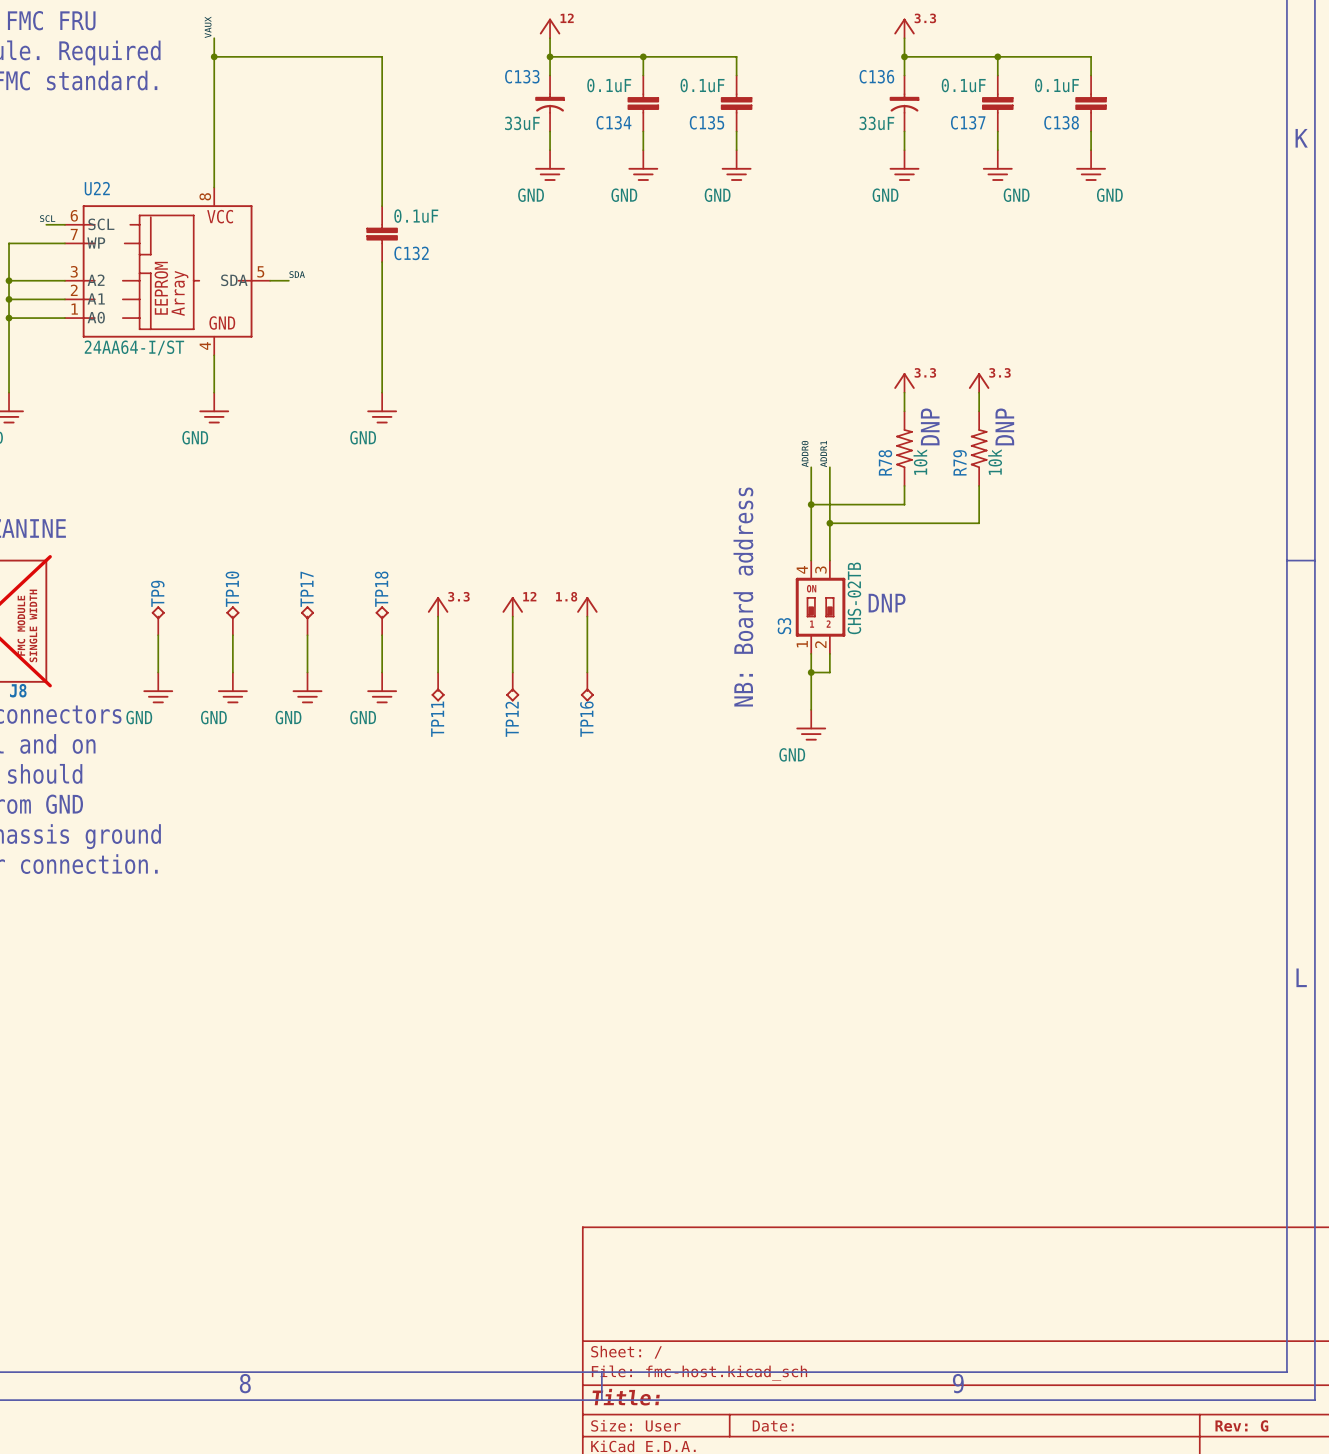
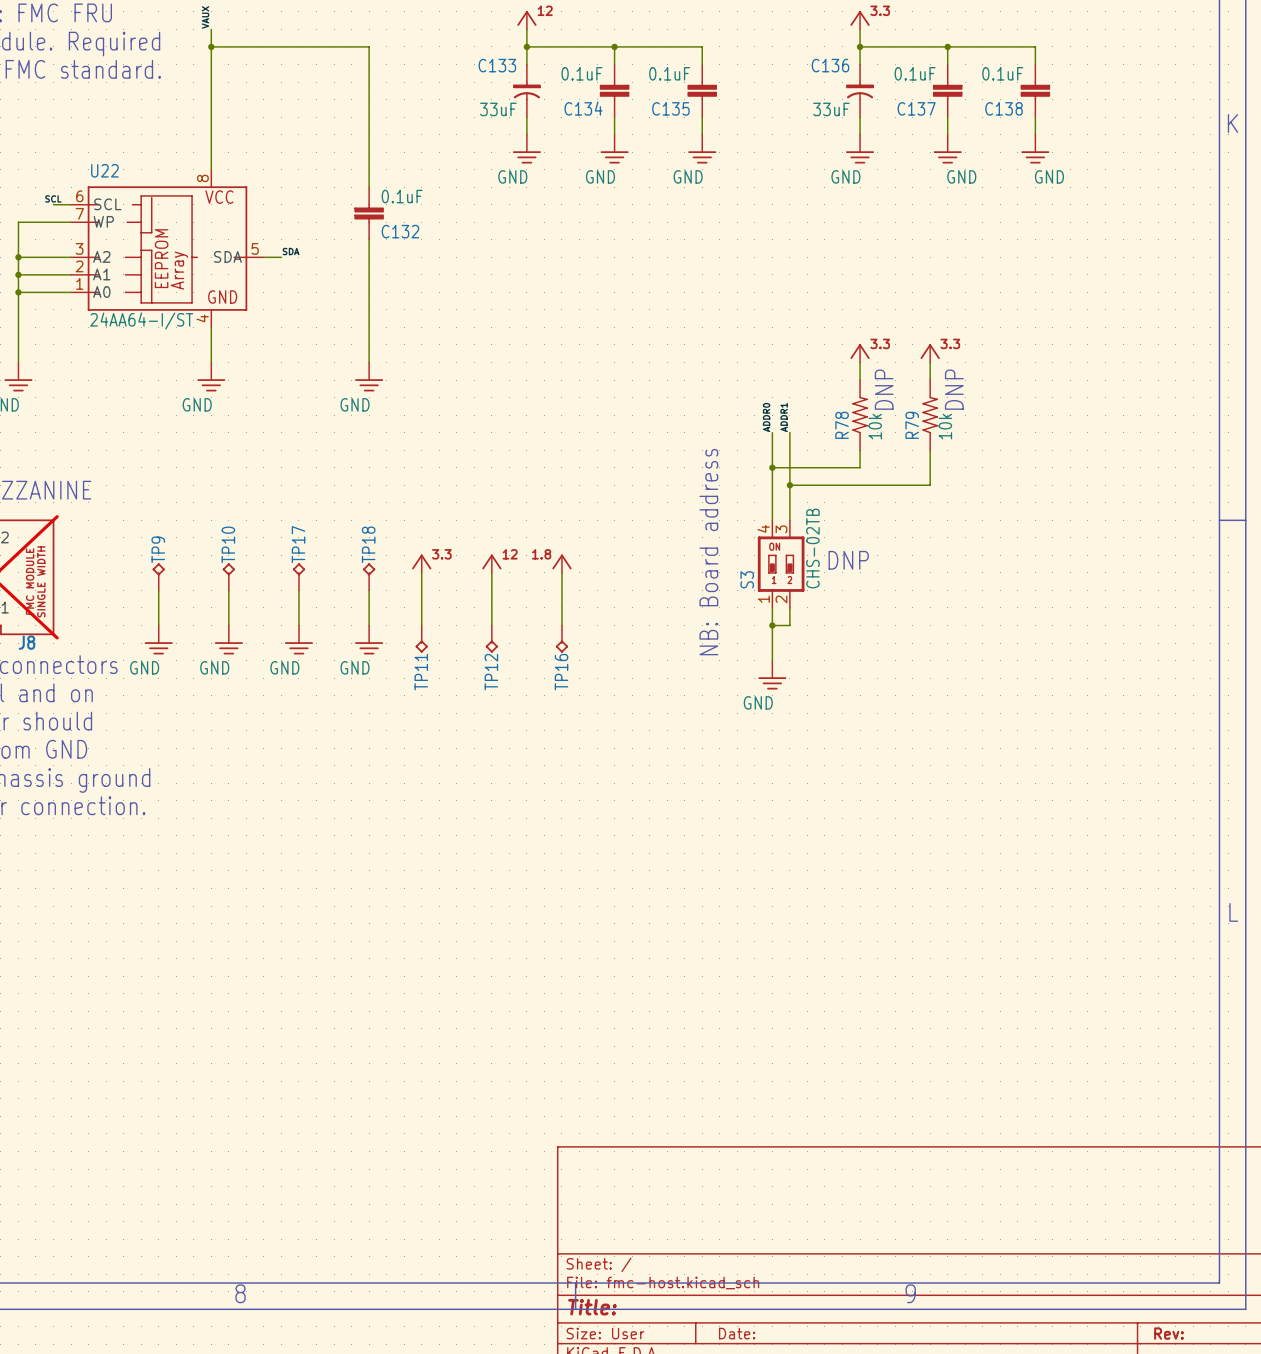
title block: Rev: G (1241, 1425) -> Rev: (1168, 1333)

